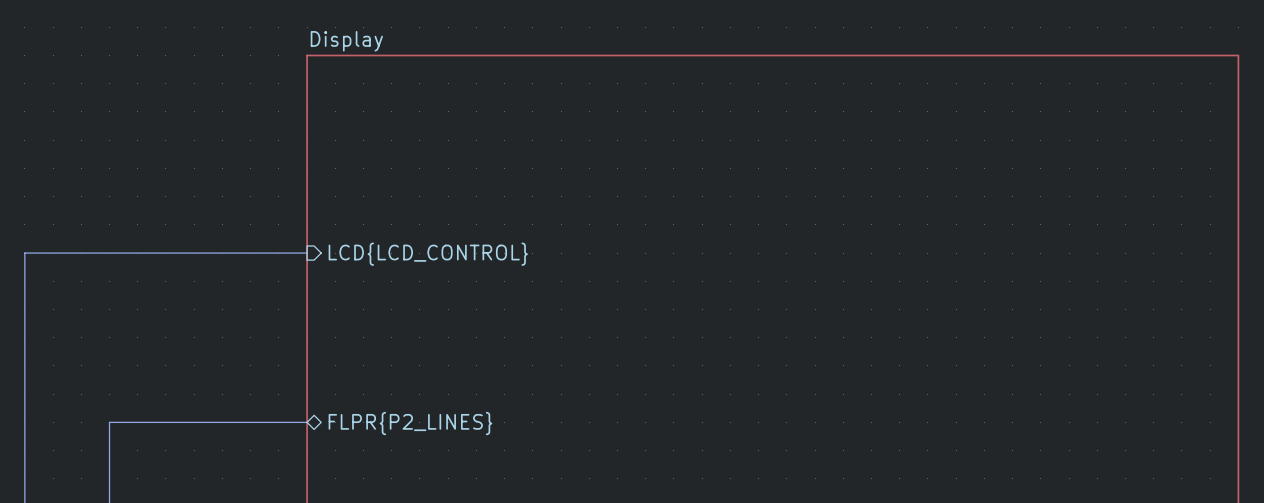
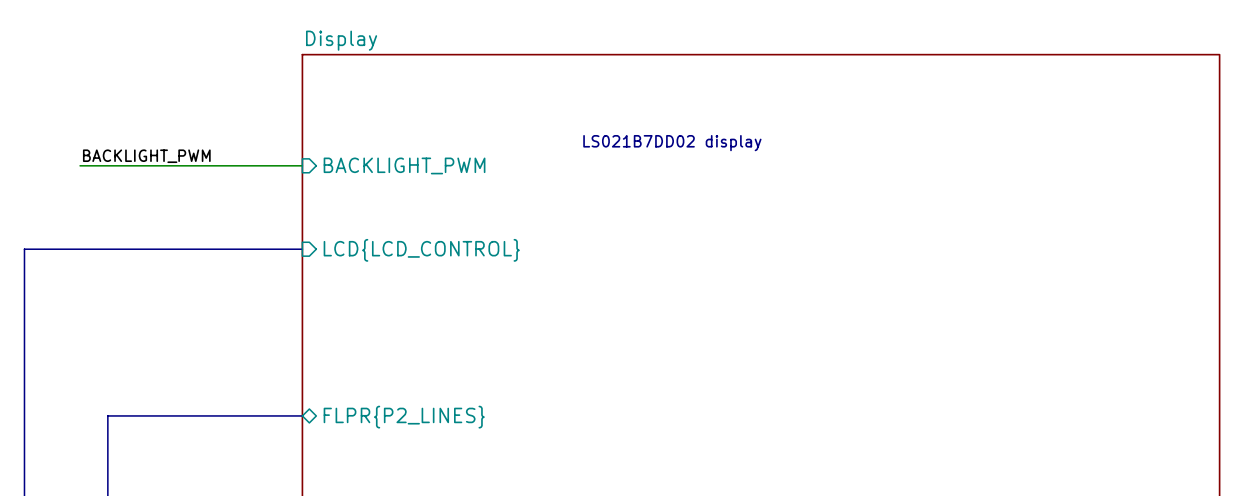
text: none -> LS021B7DD02 display (672, 143)
label: none -> BACKLIGHT_PWM (146, 156)
wire: none -> (80, 165) (302, 165)
sheet pin: none -> BACKLIGHT_PWM (404, 165)

